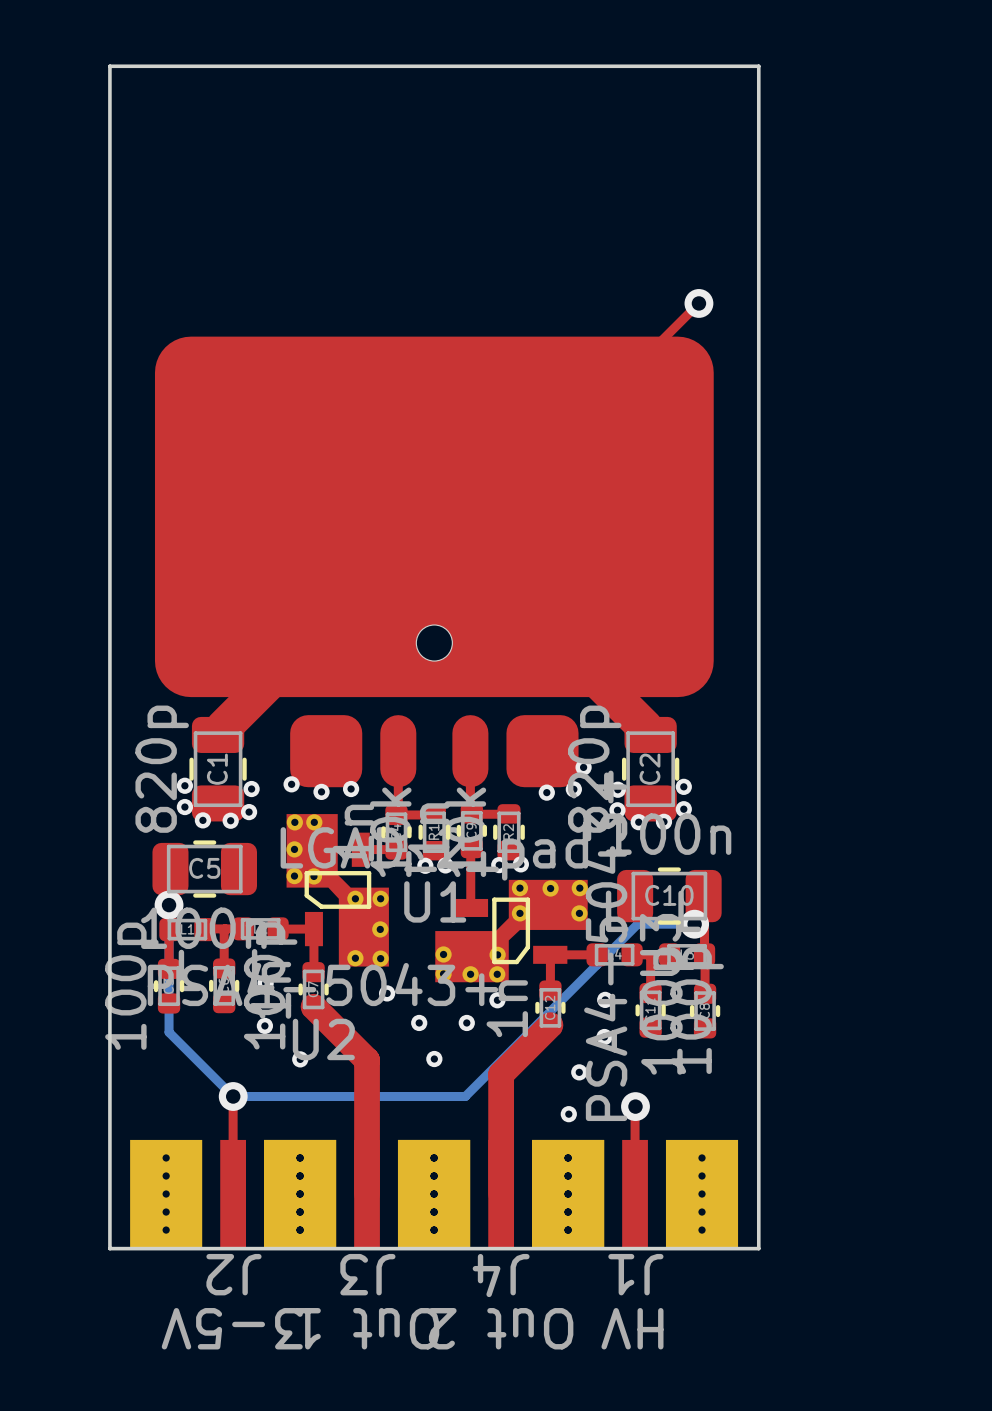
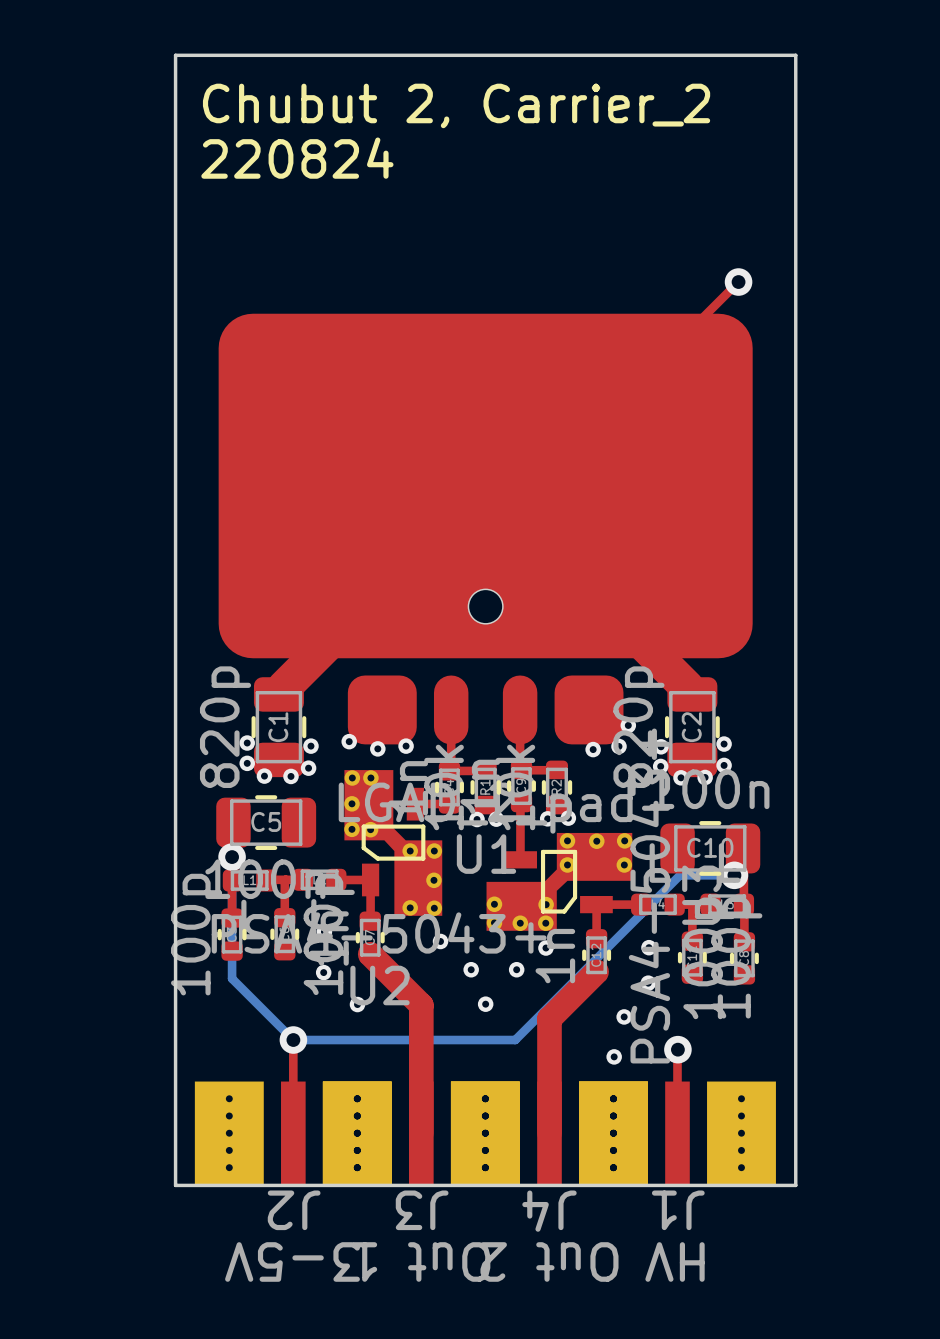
text: none -> Chubut 2, Carrier_2 (456, 105)
text: none -> 220824 (297, 158)

